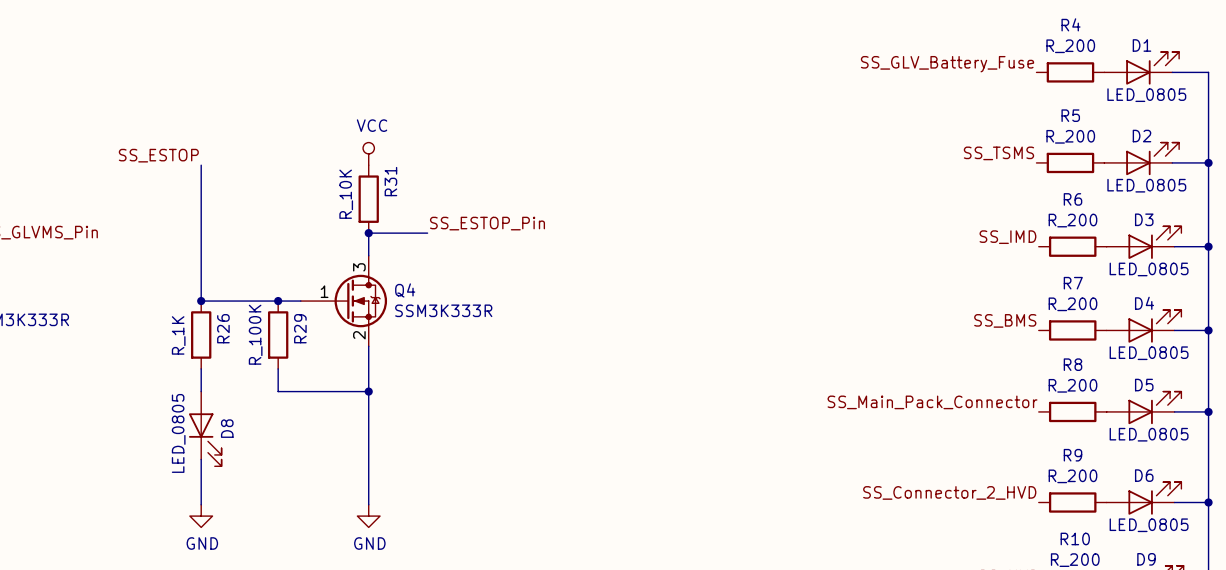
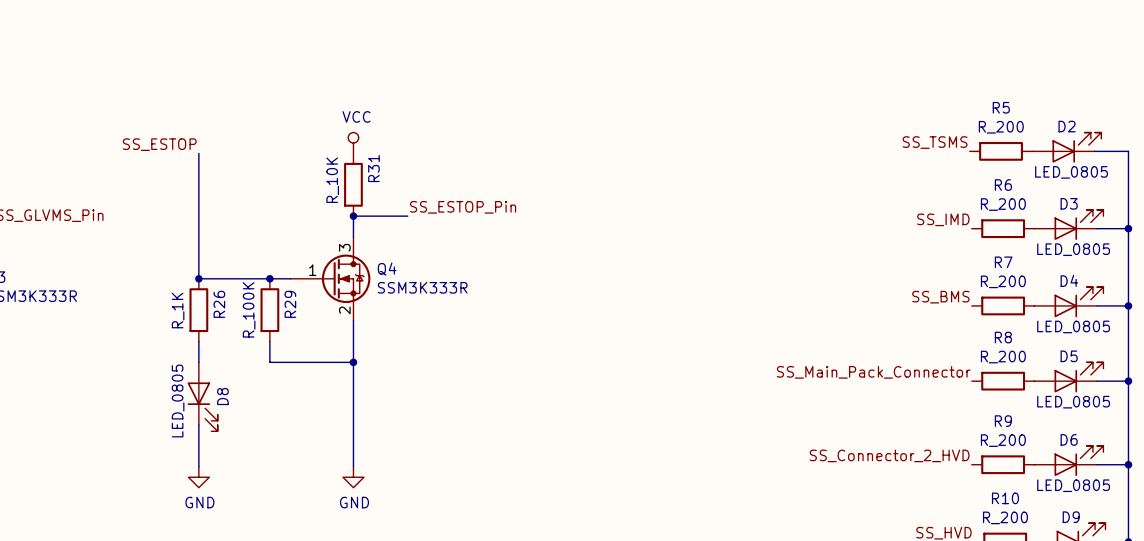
label: SS_GLV_Battery_Fuse (947, 64) -> none
D1: LED_0805 (1141, 68) -> none
R4: R_200 (1070, 72) -> none
wire: (1172, 72) (1208, 72) (1208, 162) -> none
junction: (1208, 162) -> none

